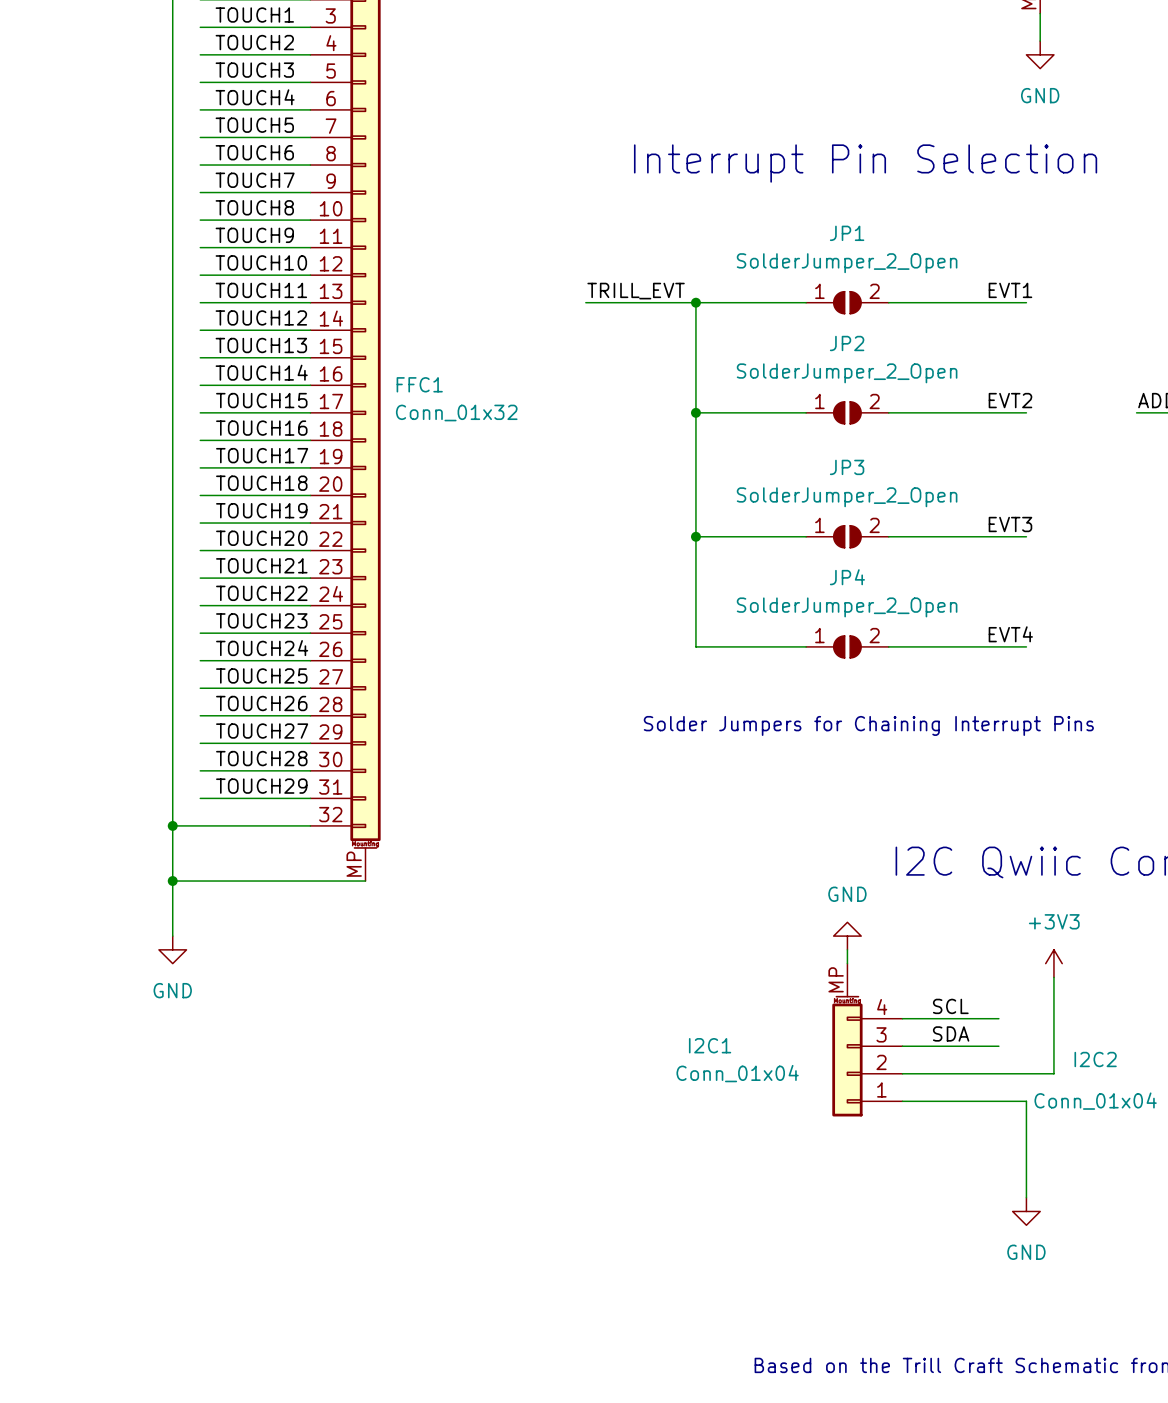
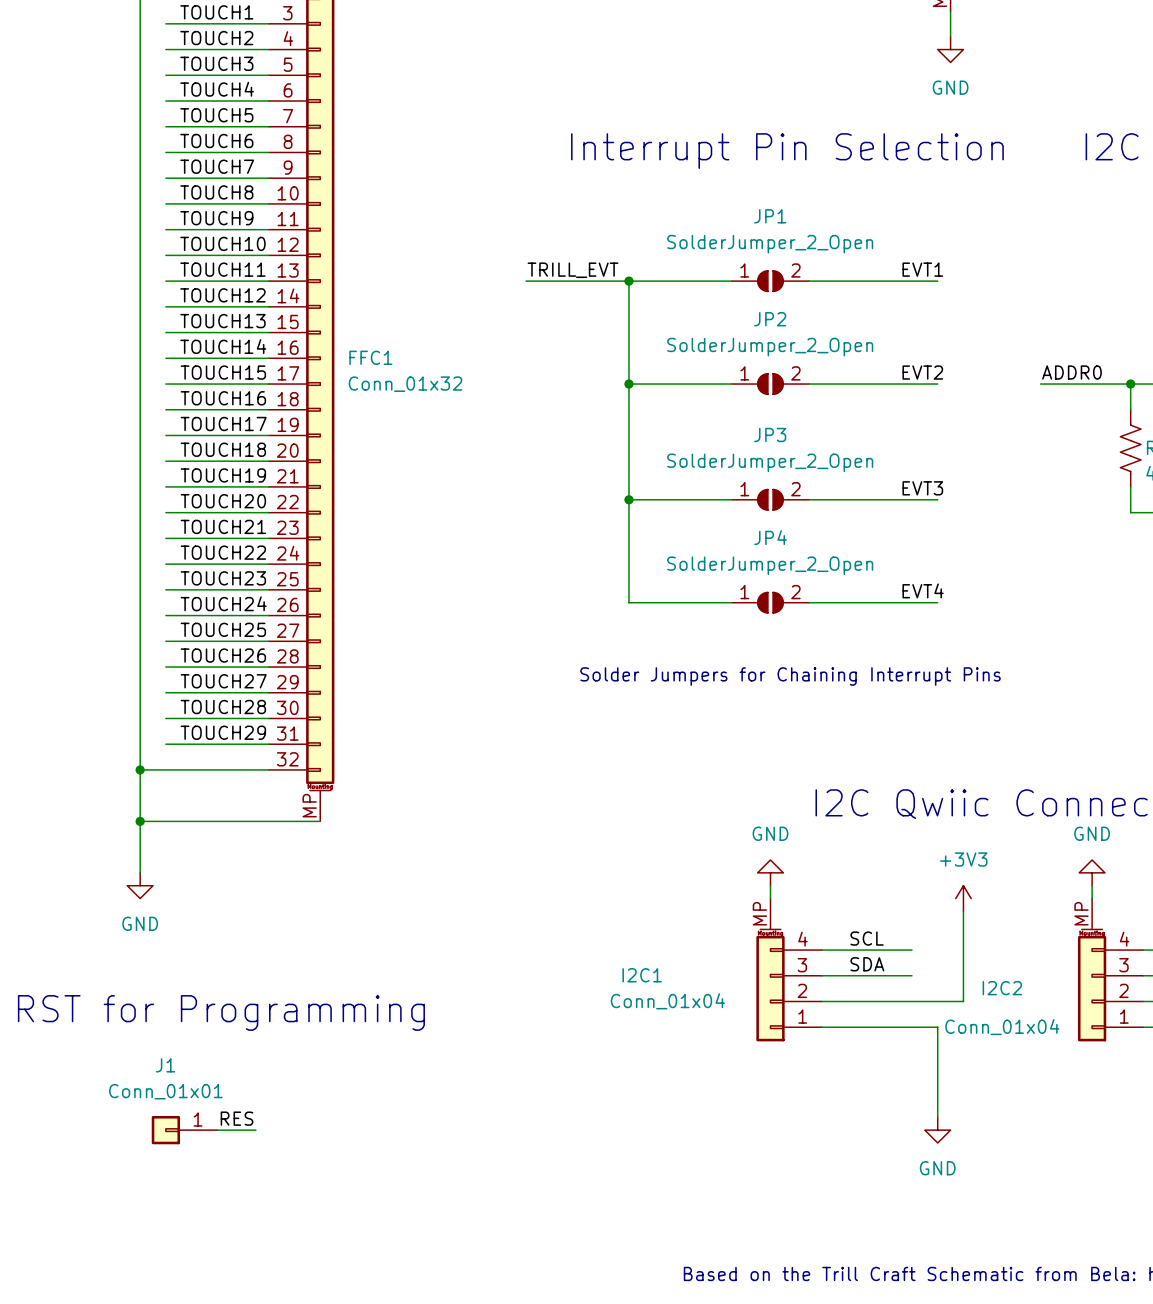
text: none -> RST for Programming (221, 1012)
label: none -> RES (237, 1118)
J1: none -> Conn_01x01 (184, 1130)
wire: none -> (217, 1130) (255, 1130)

